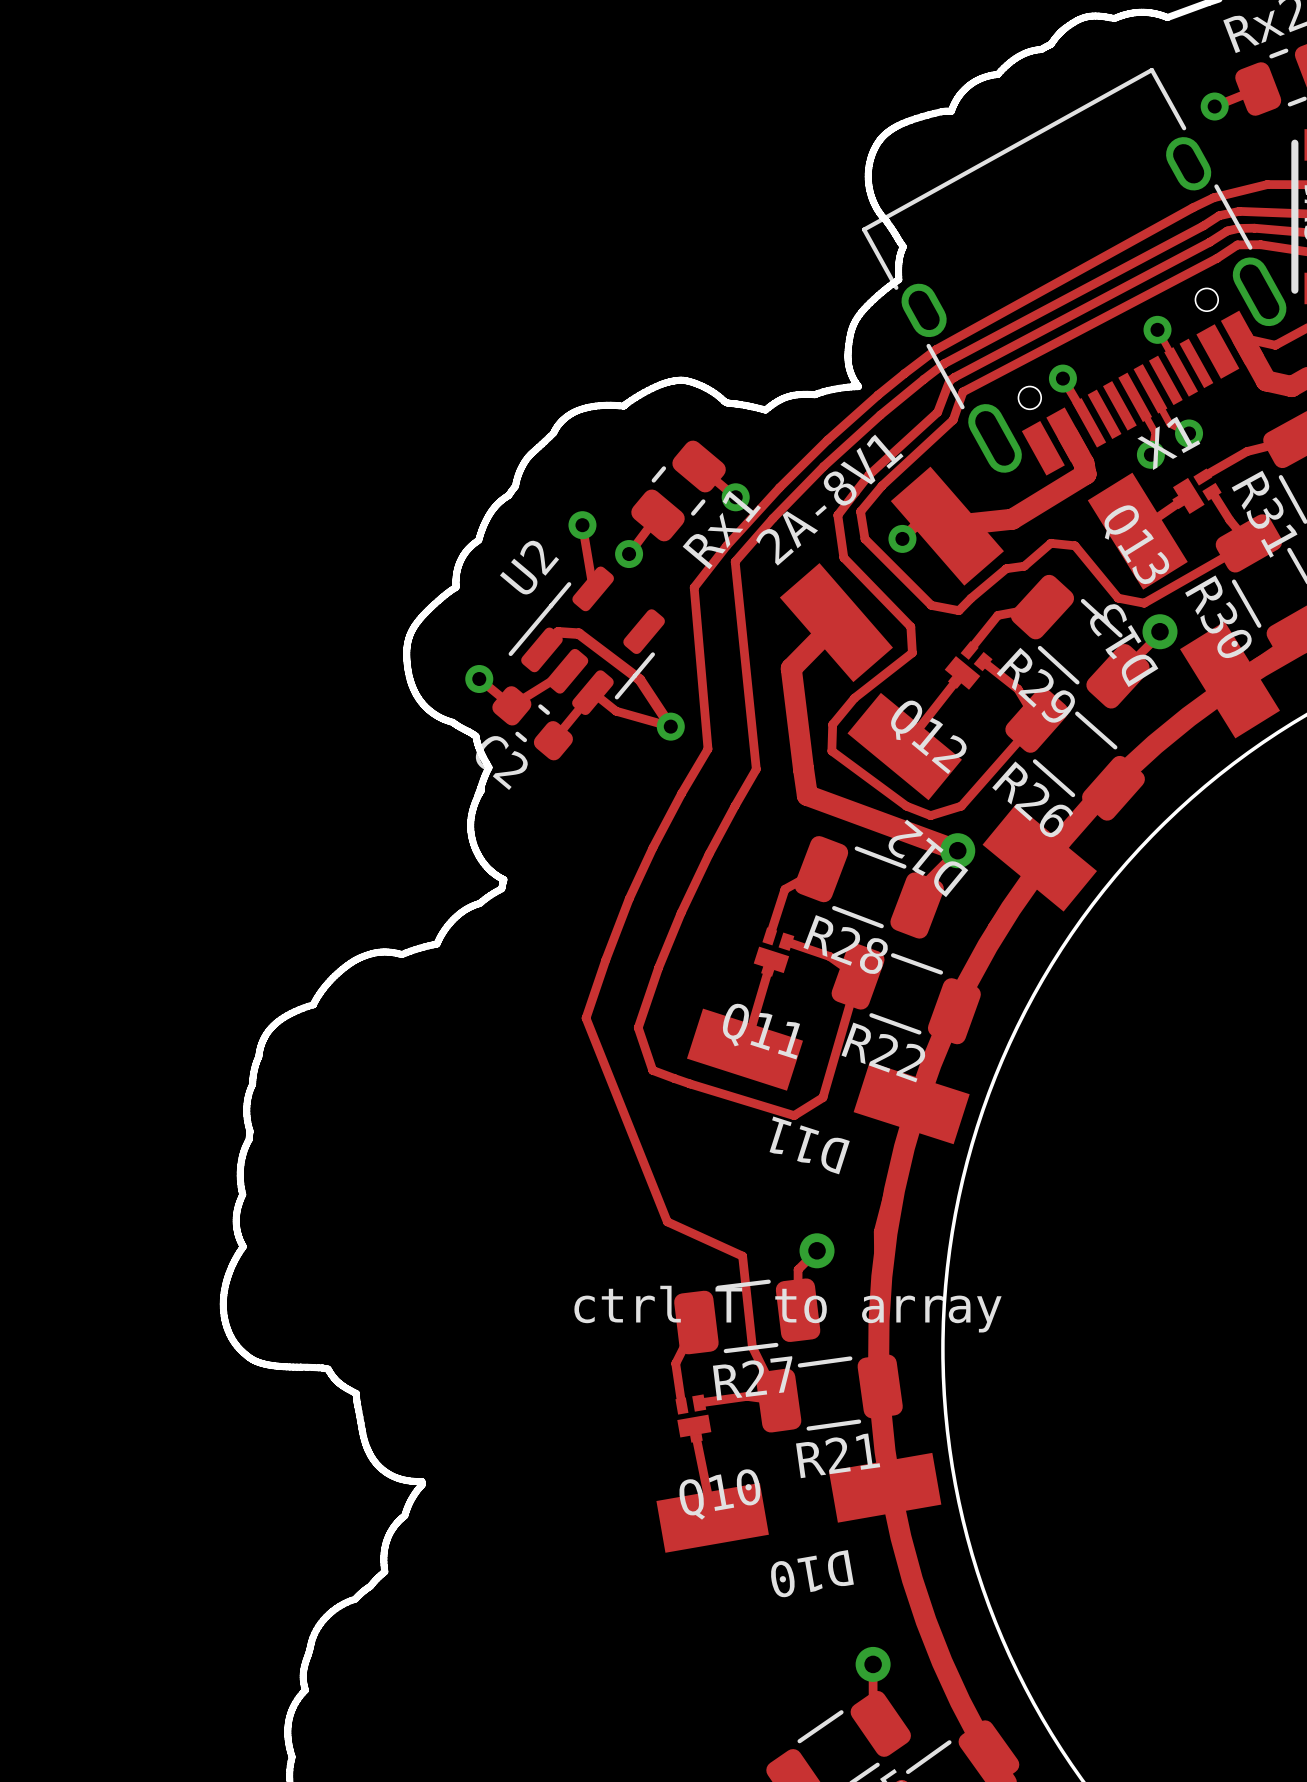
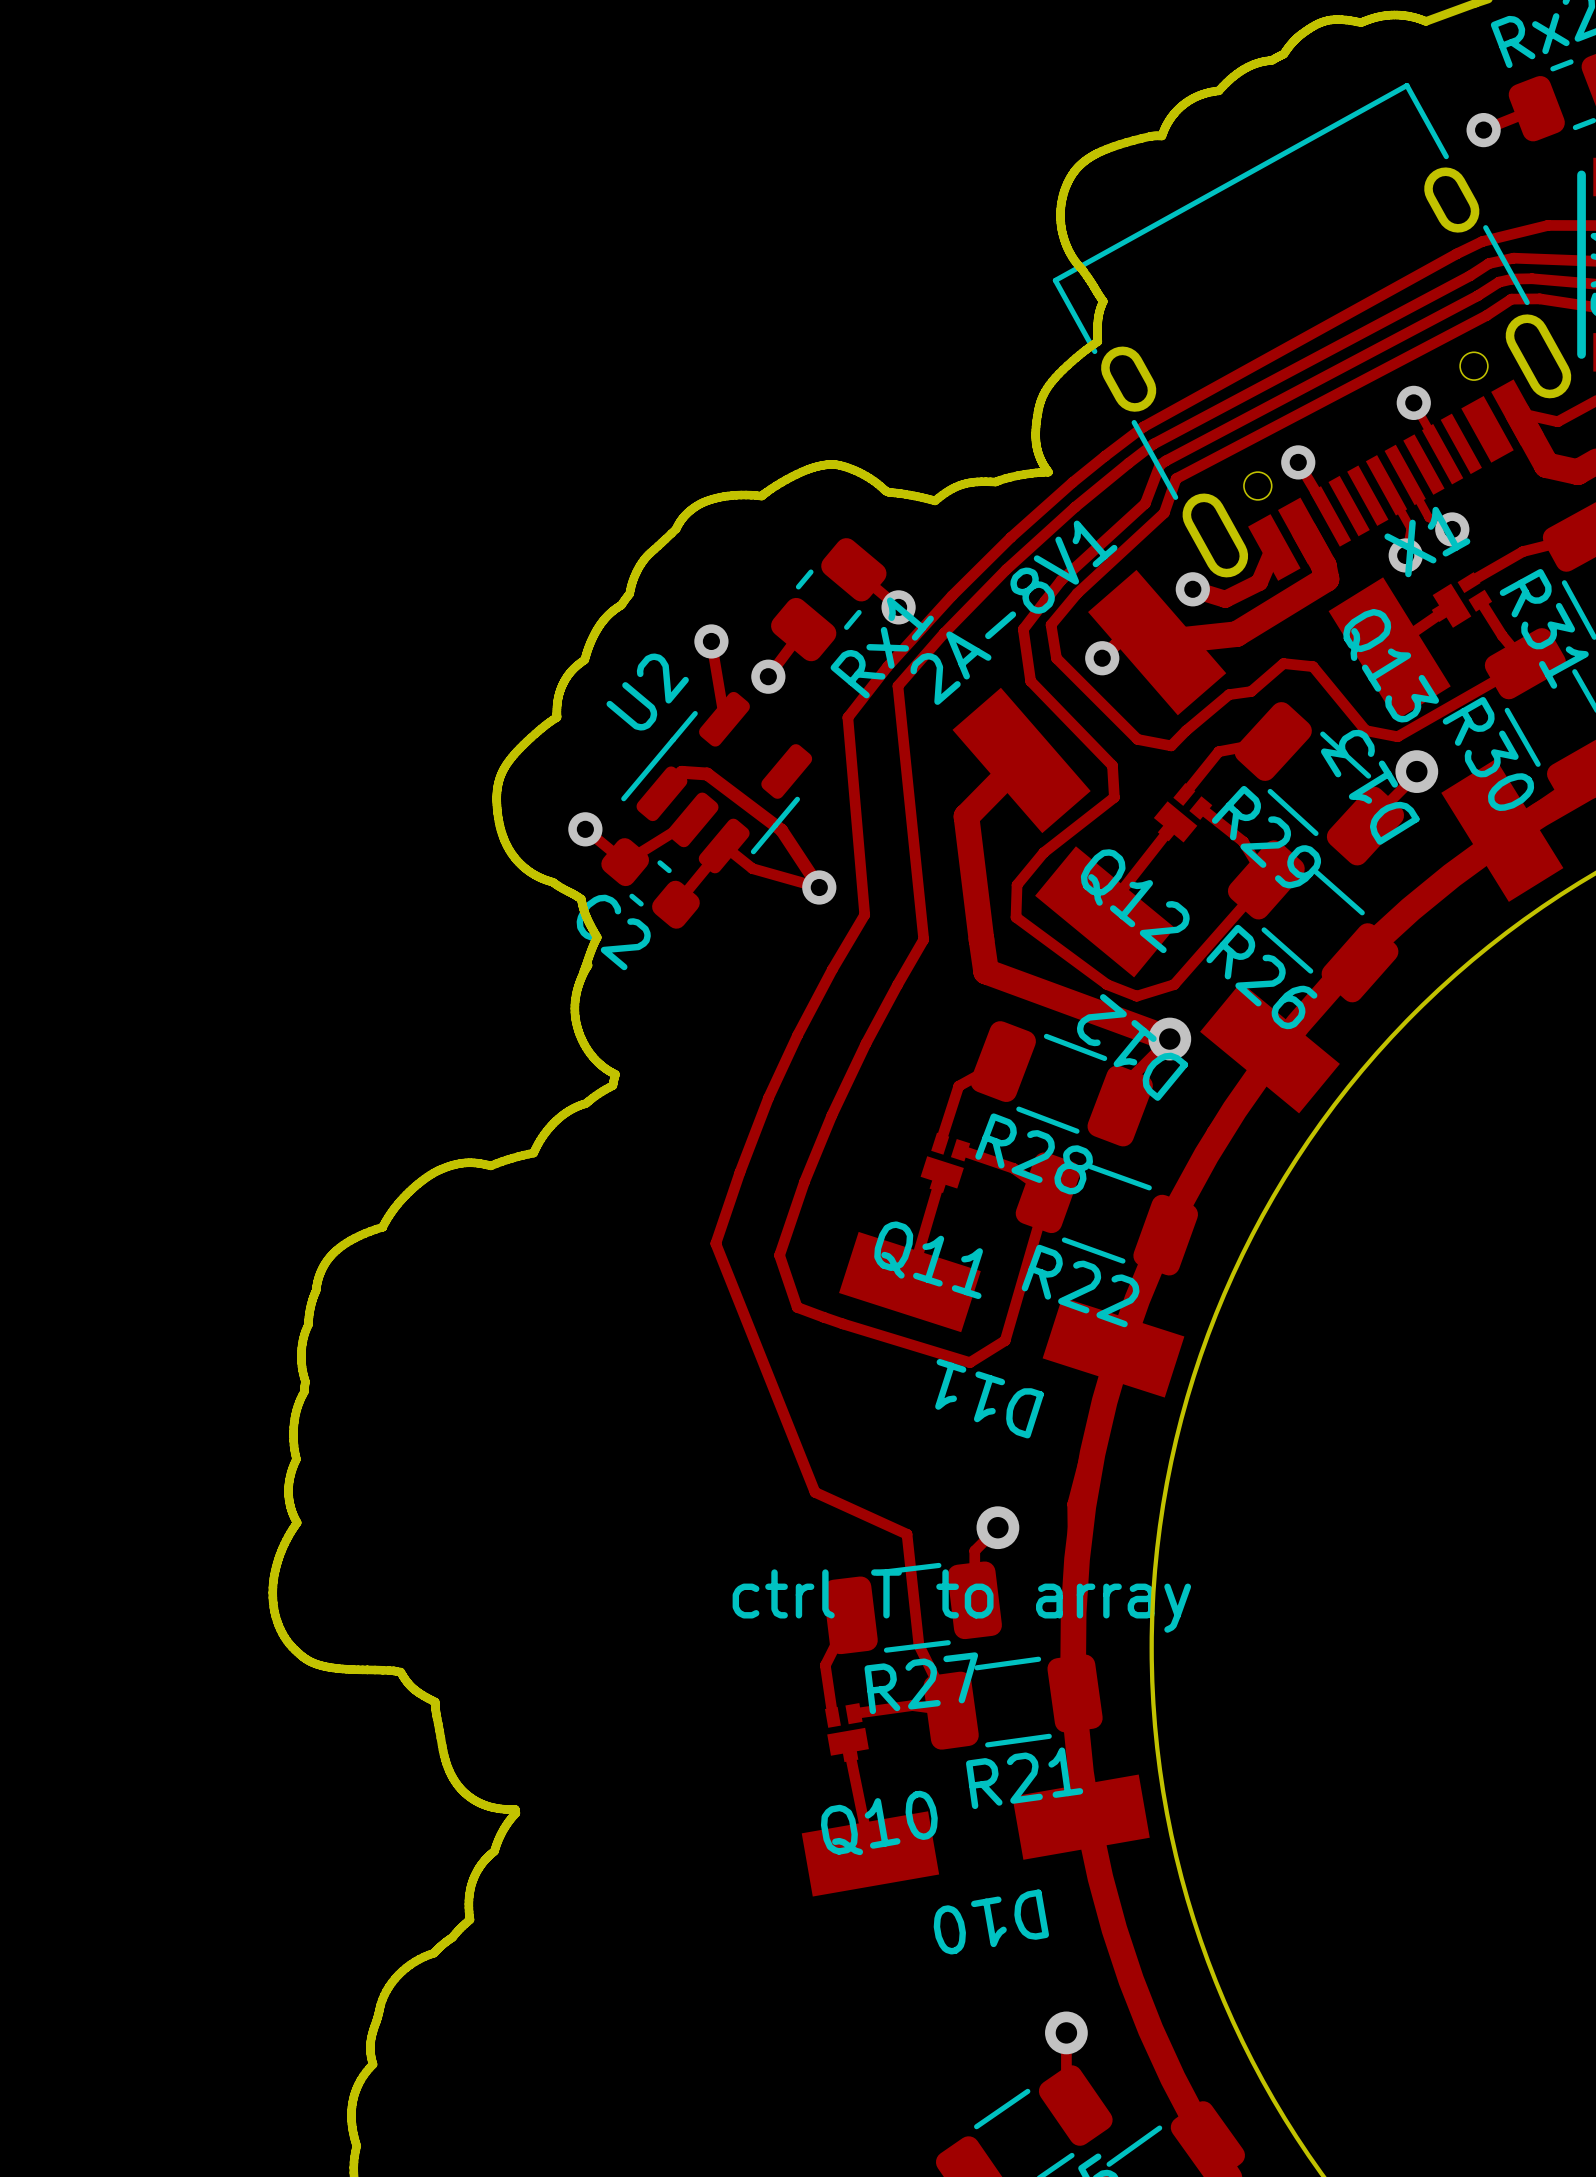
track: none -> (1274, 547) (1259, 582) (1225, 599) (1192, 589)
via: none -> (1192, 589)

